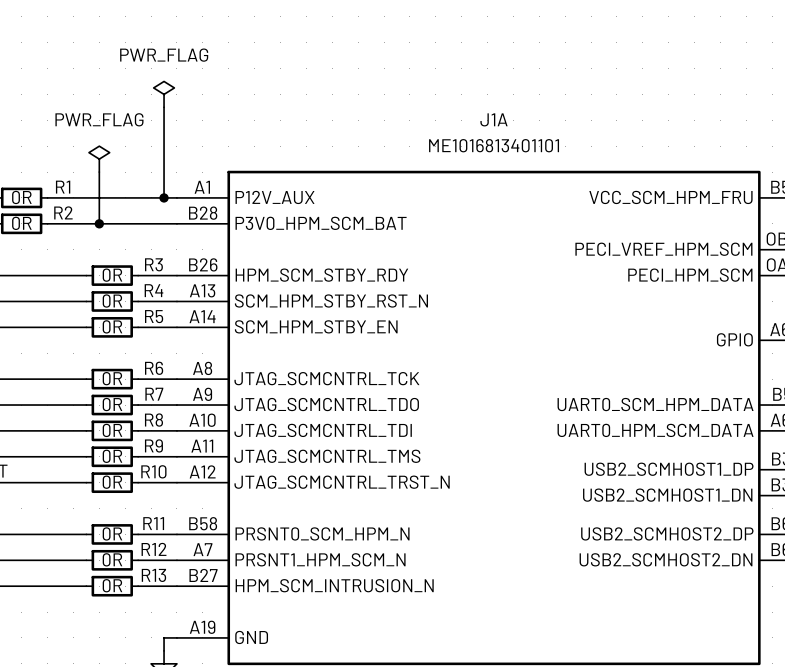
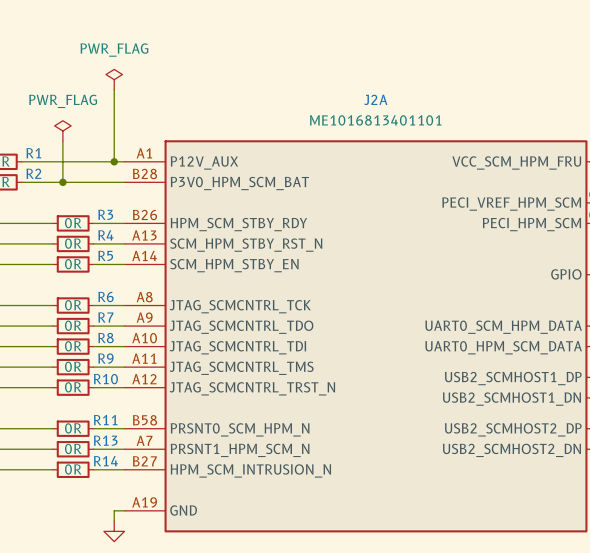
J1A name: J1A (493, 119) -> J2A (375, 99)
R12 name: R12 (154, 549) -> R13 (105, 440)
R13 name: R13 (153, 575) -> R14 (105, 461)

